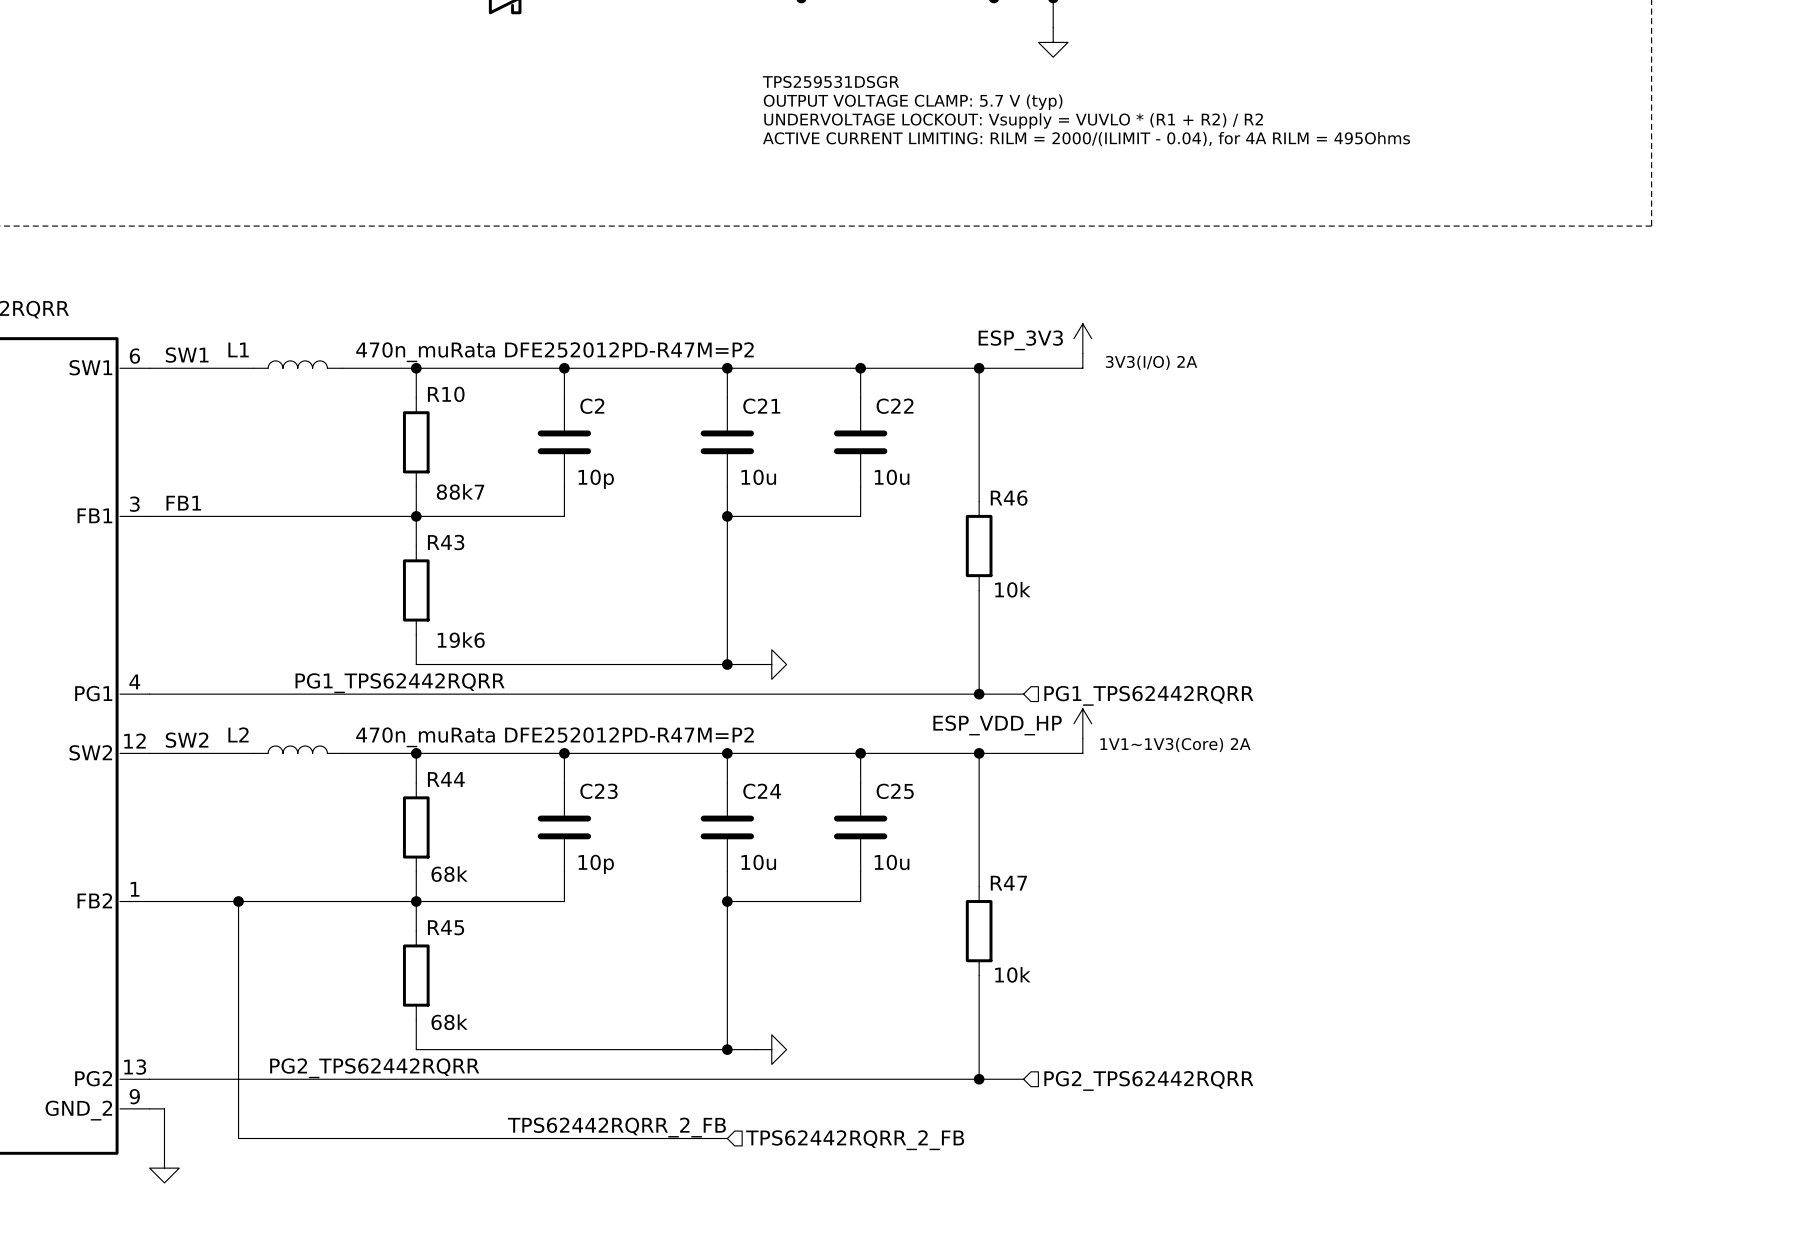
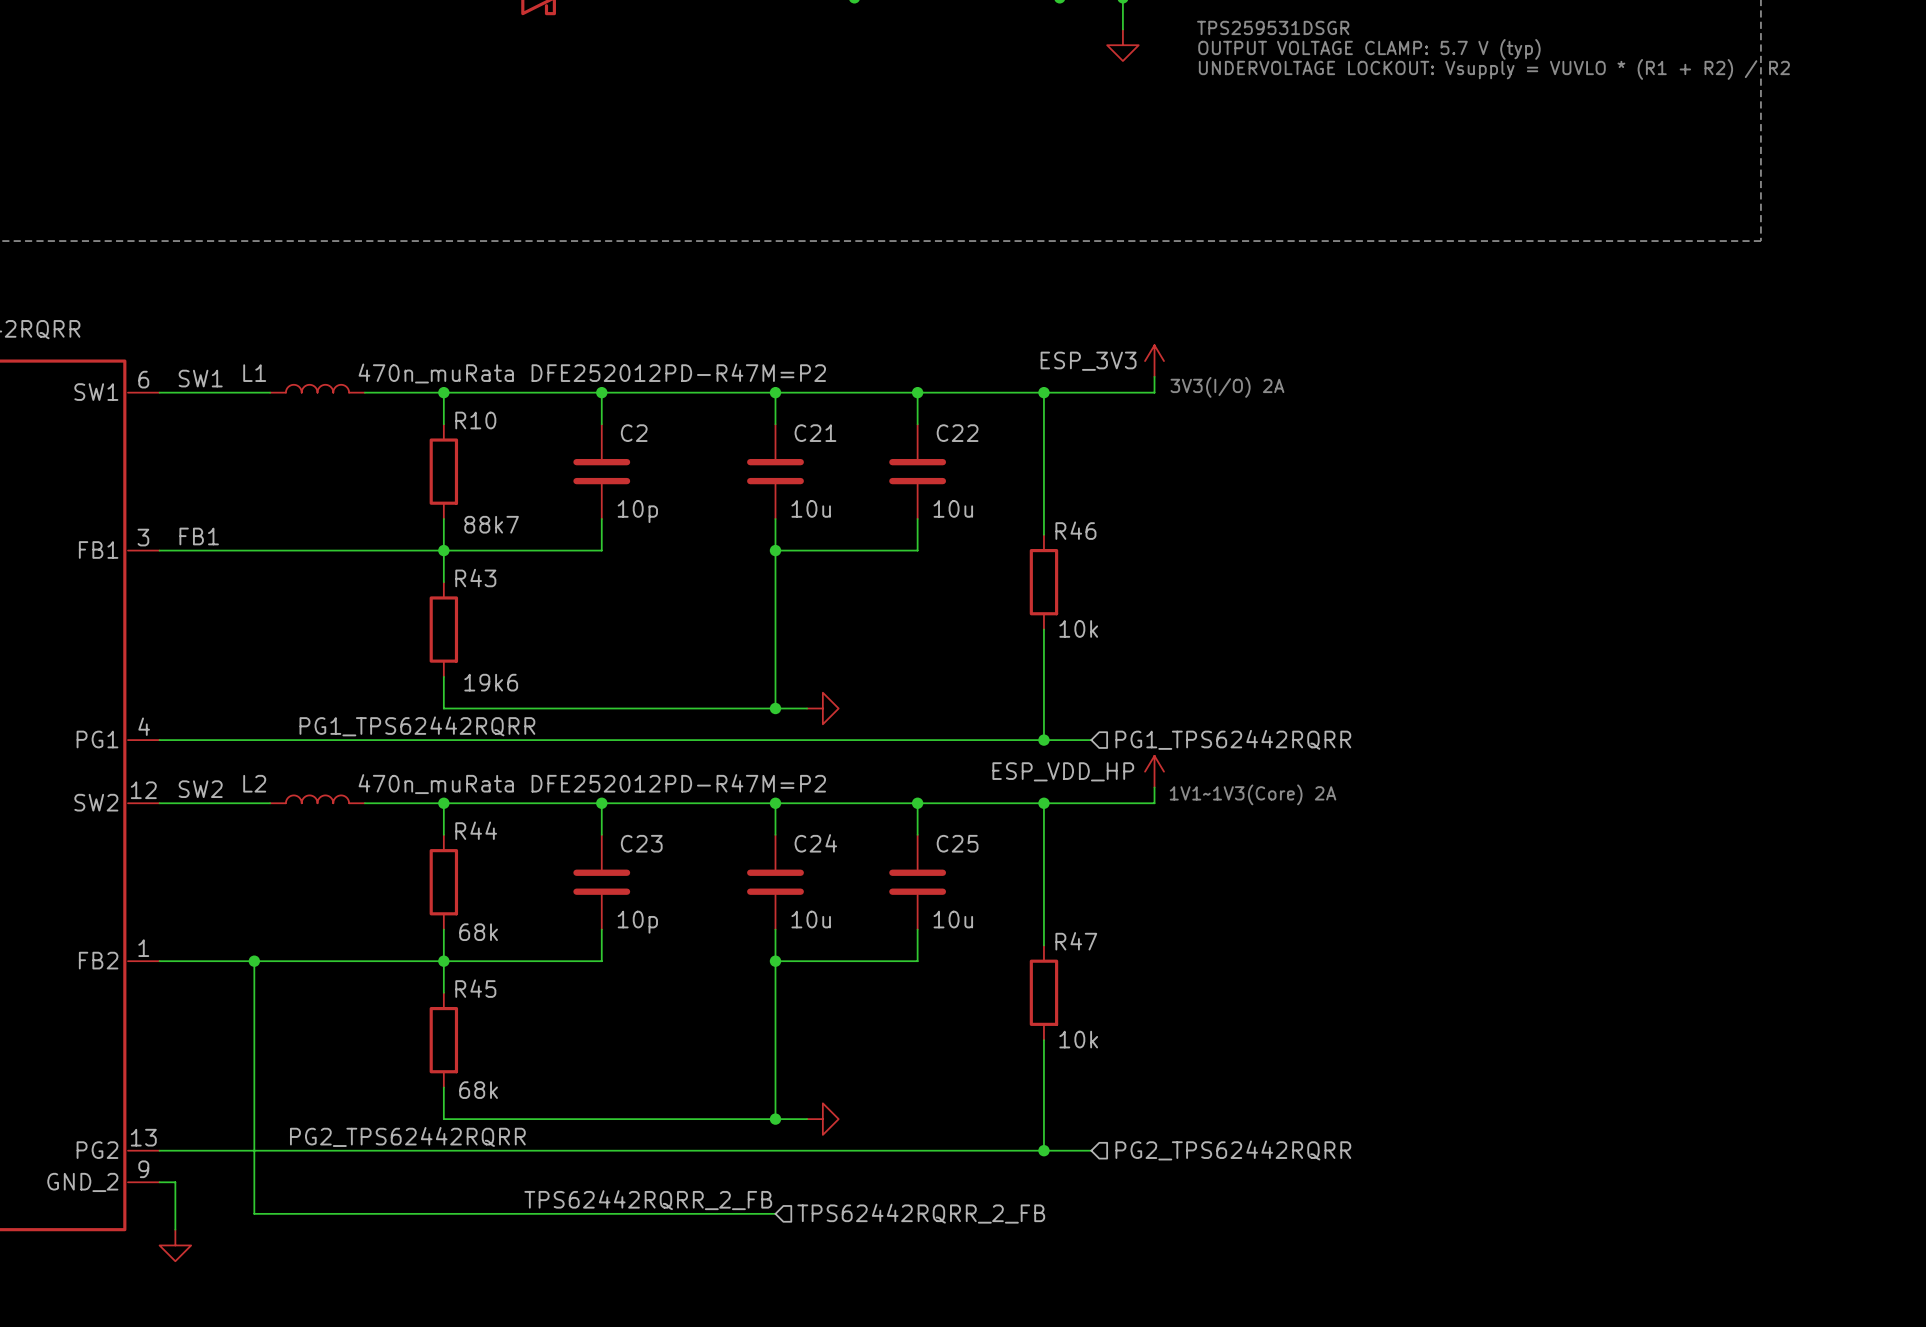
text: none -> TPS259531DSGR (1273, 27)
text: none -> OUTPUT VOLTAGE CLAMP: 5.7 V (typ) (1369, 49)
text: none -> UNDERVOLTAGE LOCKOUT: Vsupply = VUVLO * (R1 + R2) / R2 (1494, 69)
text: TPS259531DSGR (830, 81) -> none
text: OUTPUT VOLTAGE CLAMP: 5.7 V (typ) (913, 102) -> none
text: UNDERVOLTAGE LOCKOUT: Vsupply = VUVLO * (R1 + R2) / R2 (1013, 120) -> none
text: ACTIVE CURRENT LIMITING: RILM = 2000/(ILIMIT - 0.04), for 4A RILM = 495Ohms (1086, 139) -> none

